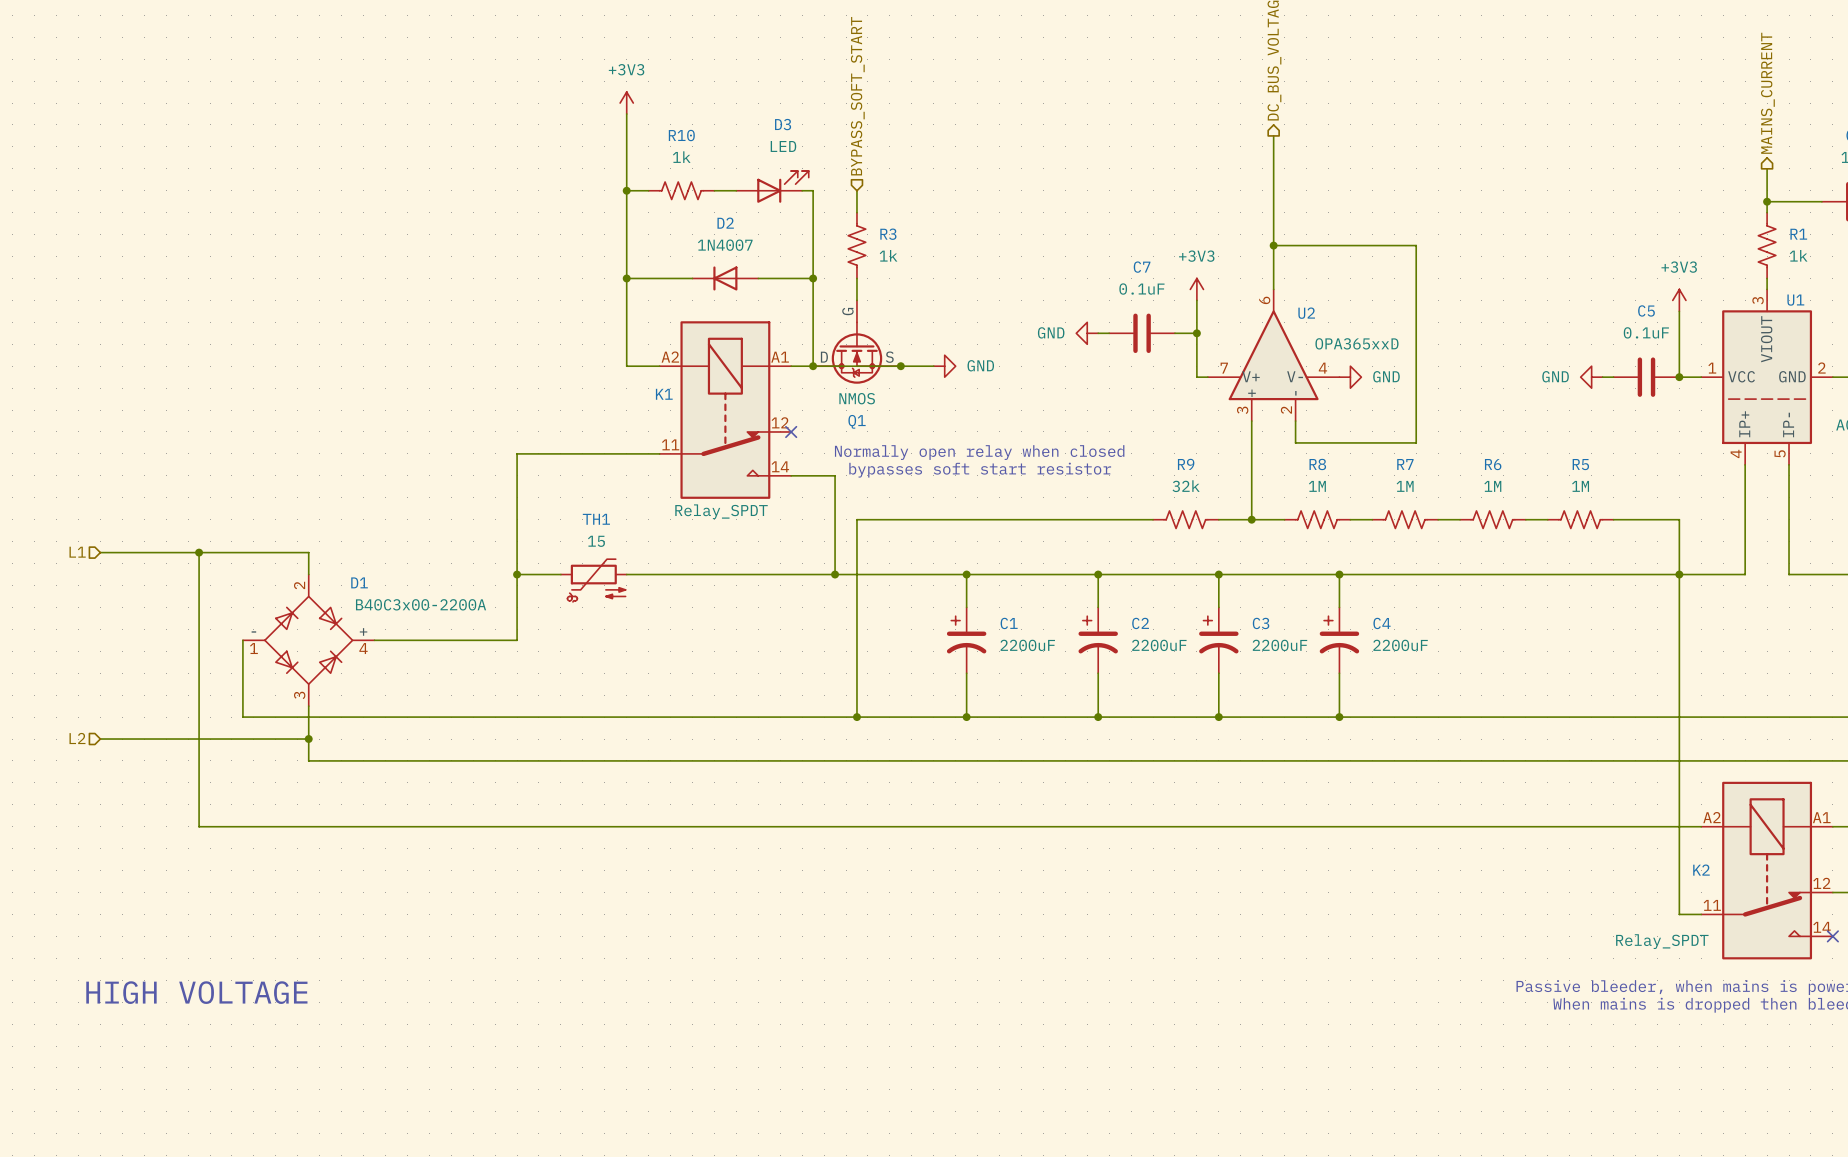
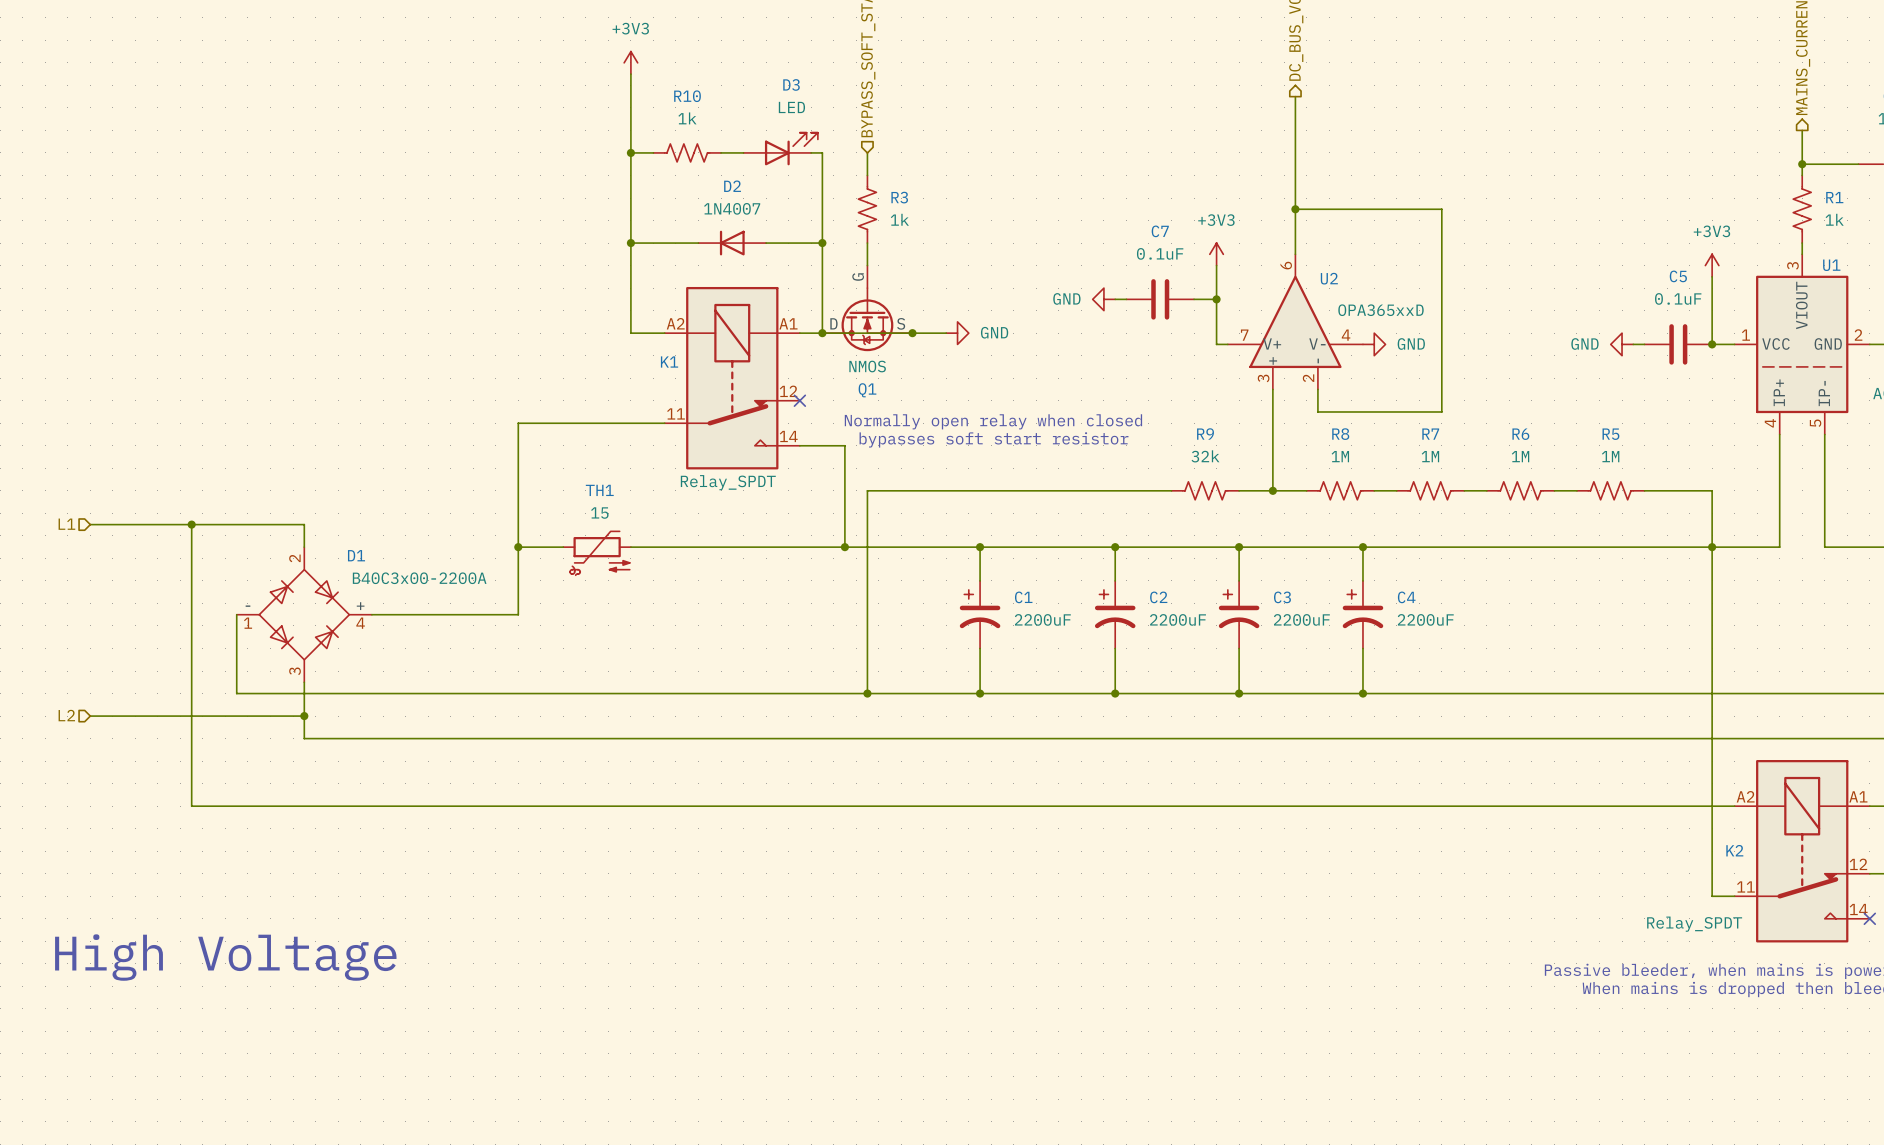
text: none -> High Voltage (225, 957)
text: HIGH VOLTAGE (196, 992) -> none

